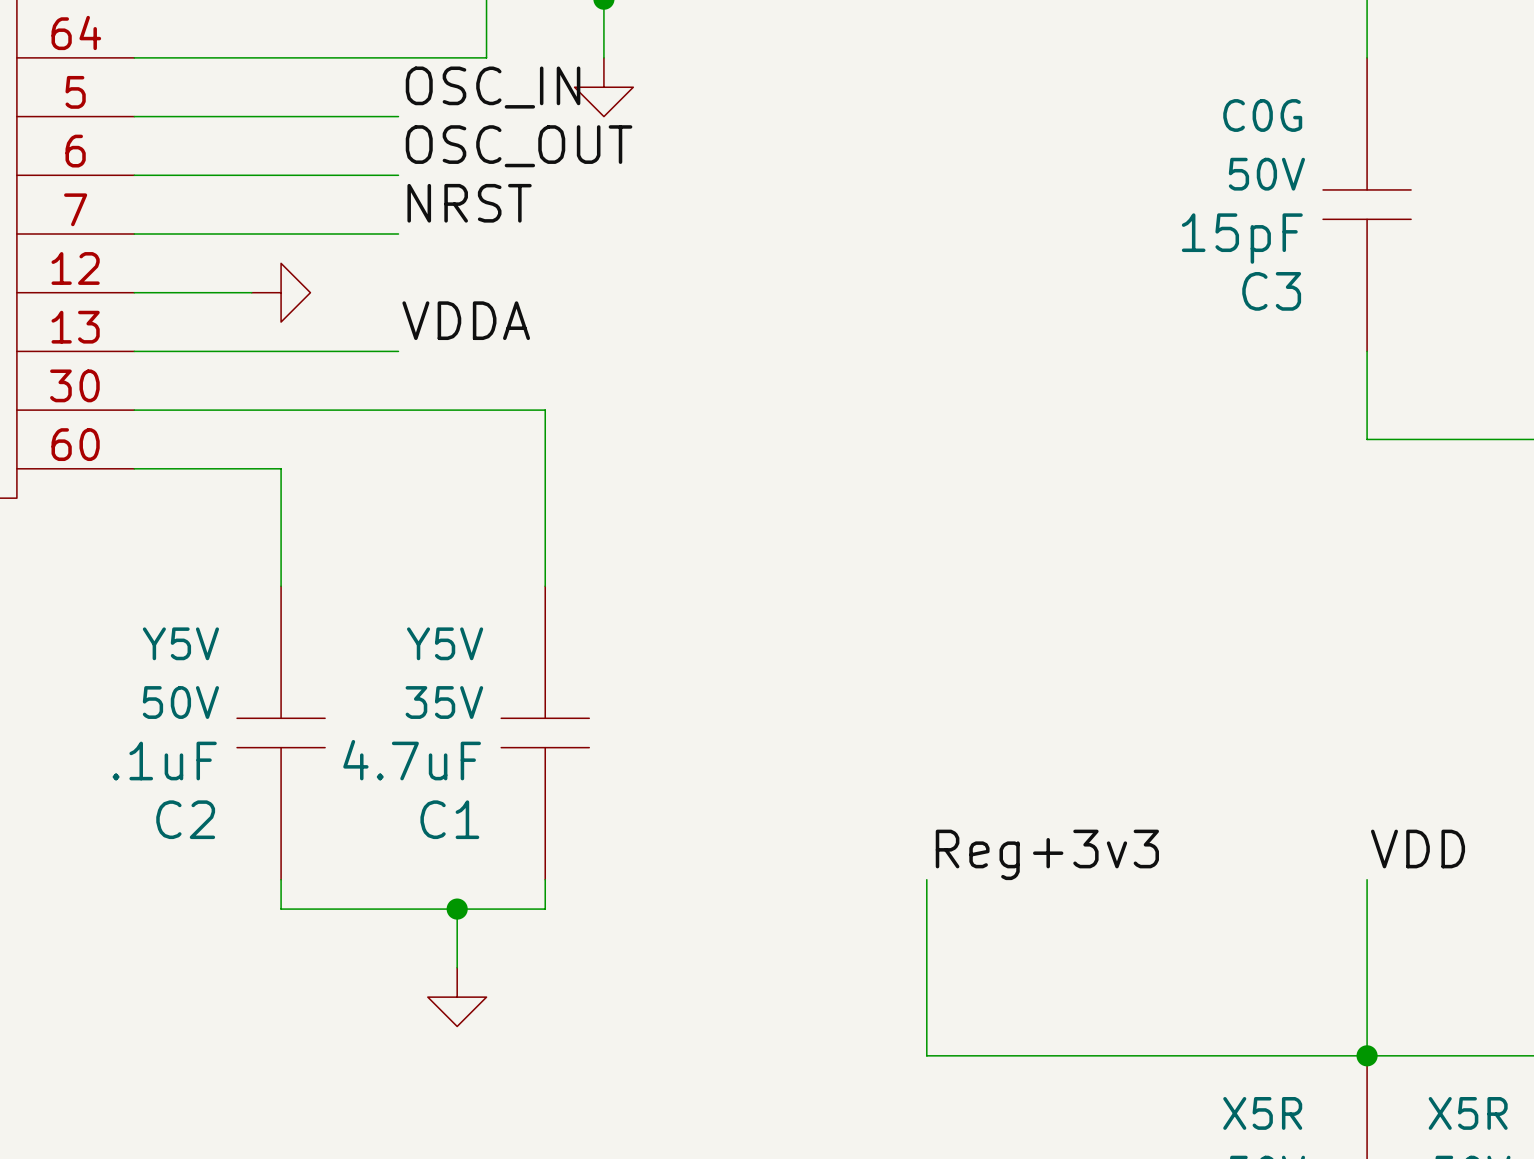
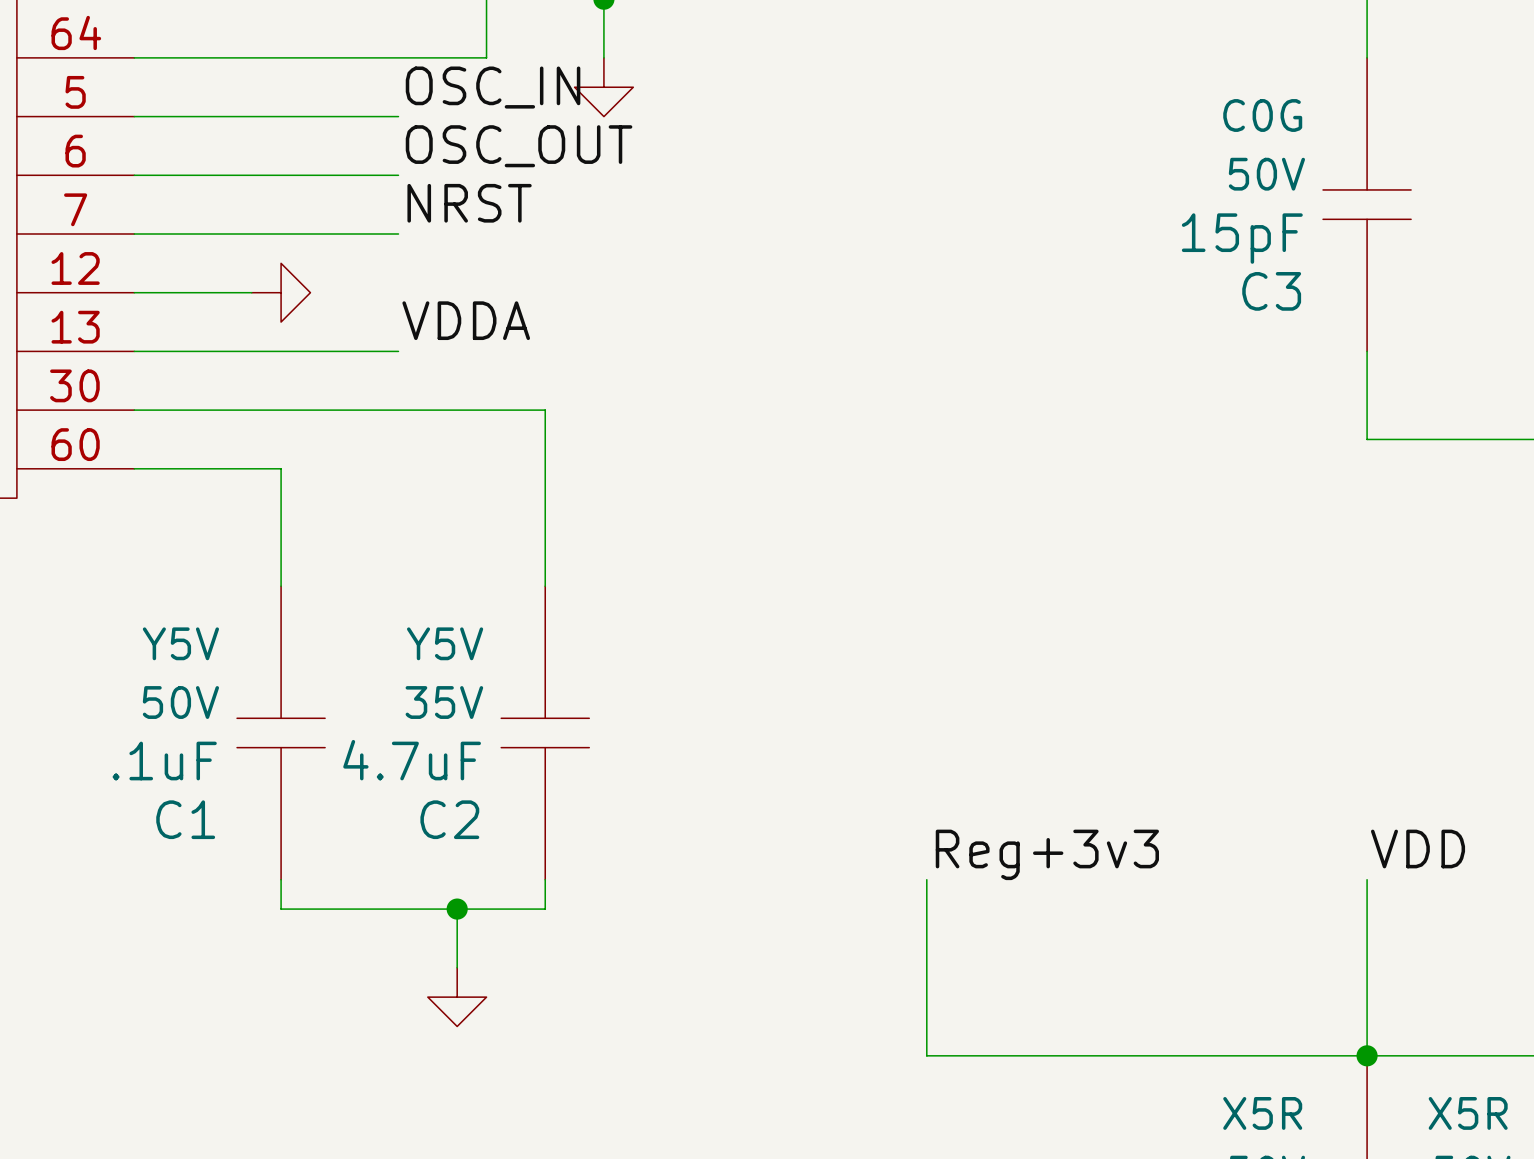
C2 name: C2 (185, 819) -> C1 (185, 819)
C1 name: C1 (449, 819) -> C2 (449, 819)

